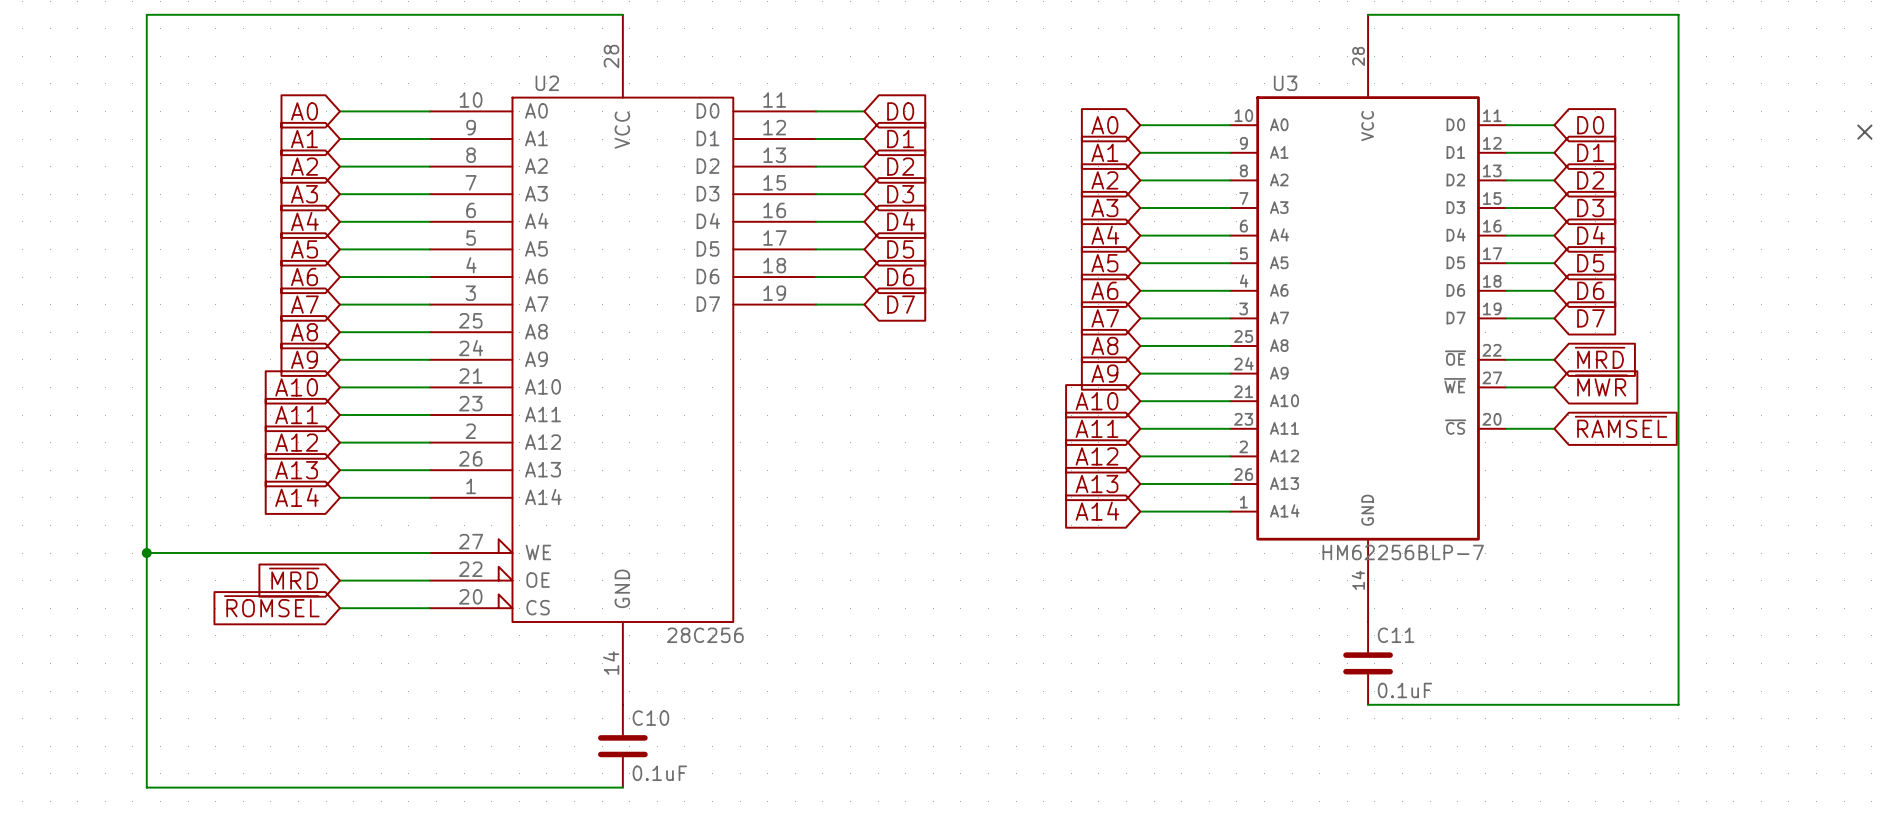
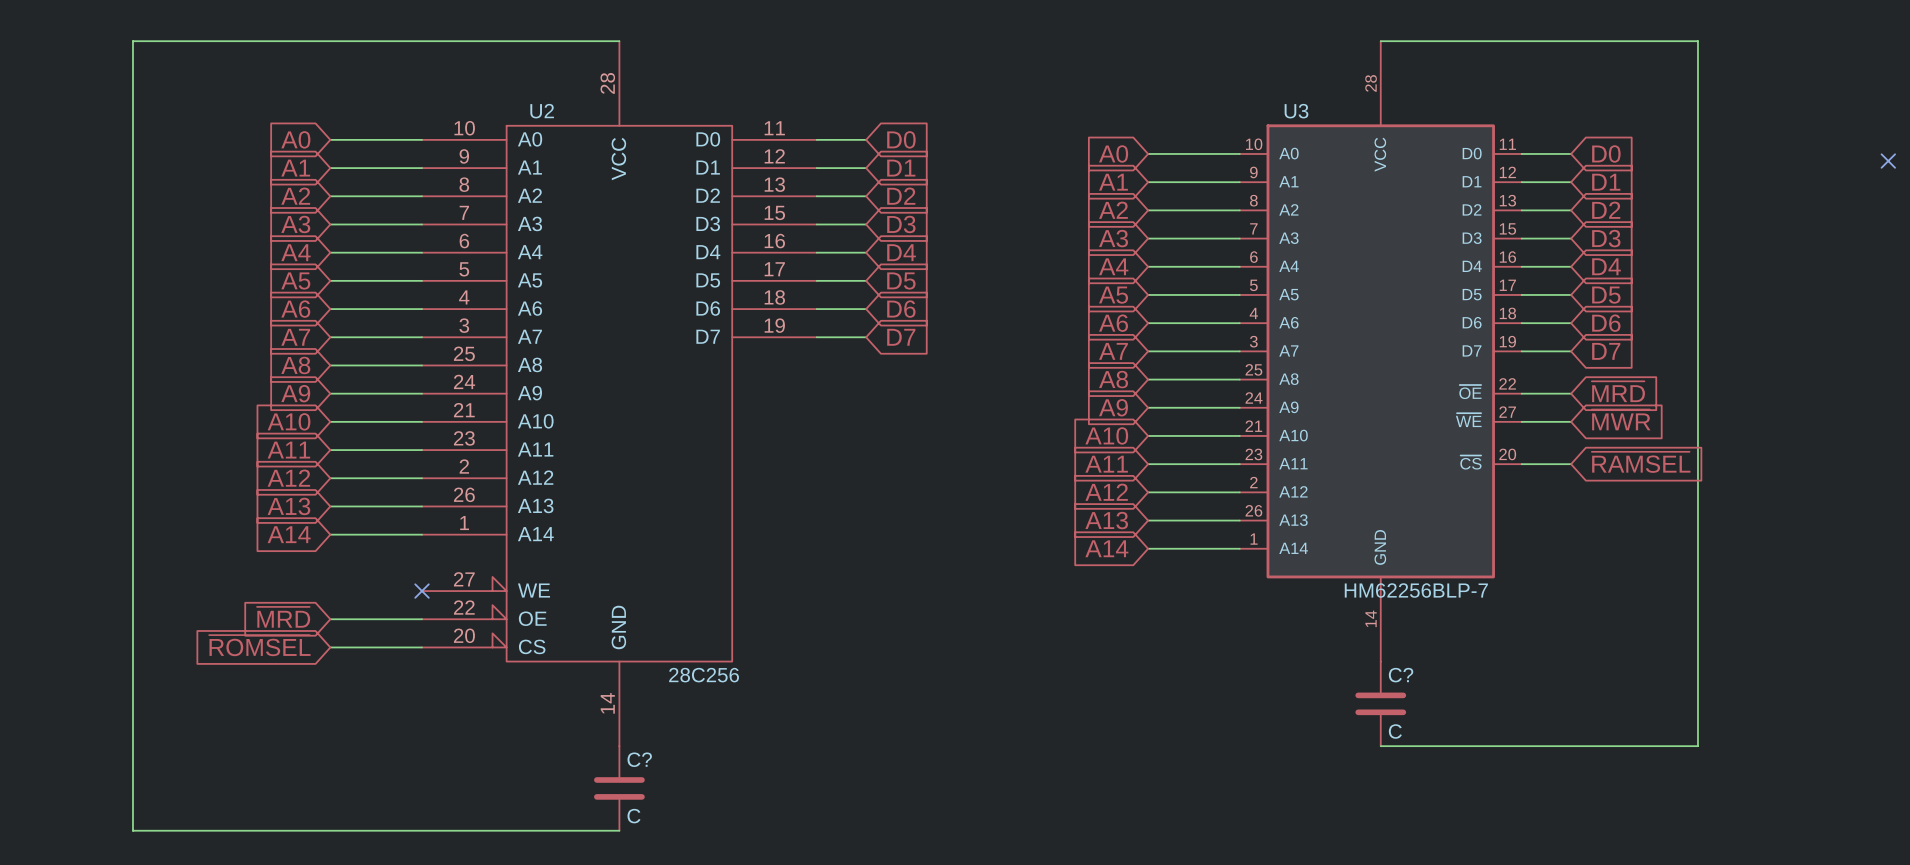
wire: (146, 553) (429, 553) -> none
junction: (146, 553) -> none
no-connect mark: none -> (422, 591)
C11 name: C11 (1396, 635) -> C? (1401, 675)
C11 value: 0.1uF (1404, 690) -> C (1395, 731)
C10 name: C10 (650, 718) -> C? (639, 759)
C10 value: 0.1uF (659, 773) -> C (633, 816)

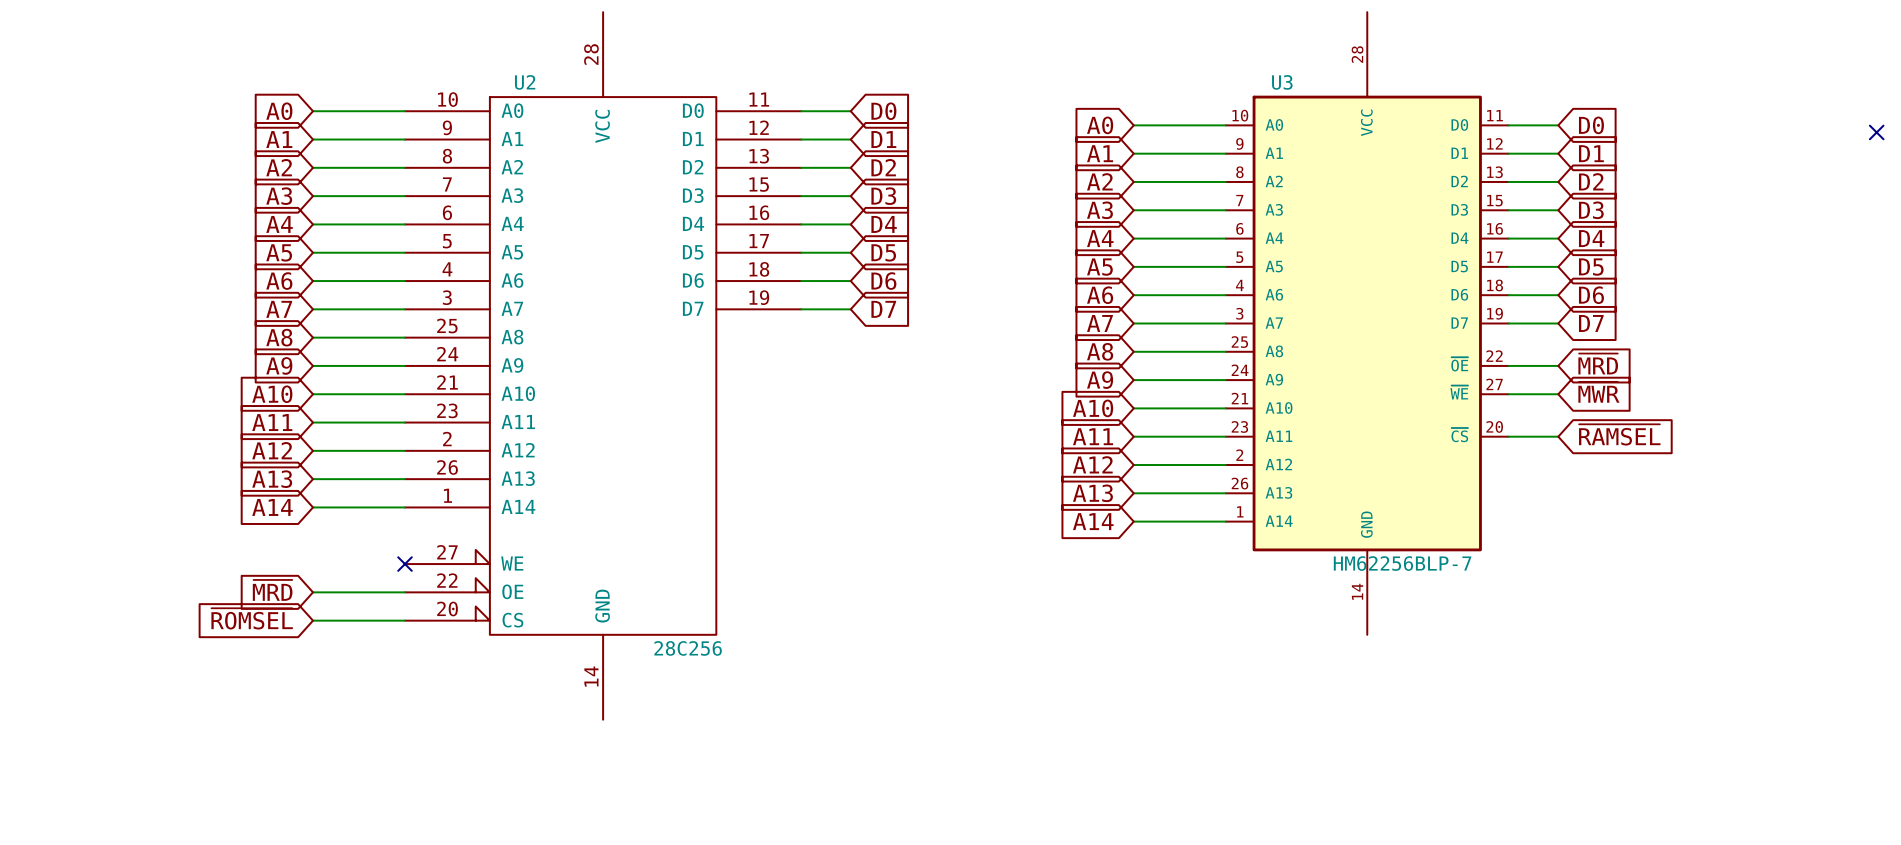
wire: (619, 41) (132, 41) (132, 830) (619, 830) -> none
wire: (1380, 41) (1697, 41) (1697, 746) (1380, 746) -> none
C?: C (1380, 703) -> none
C?: C (619, 788) -> none

